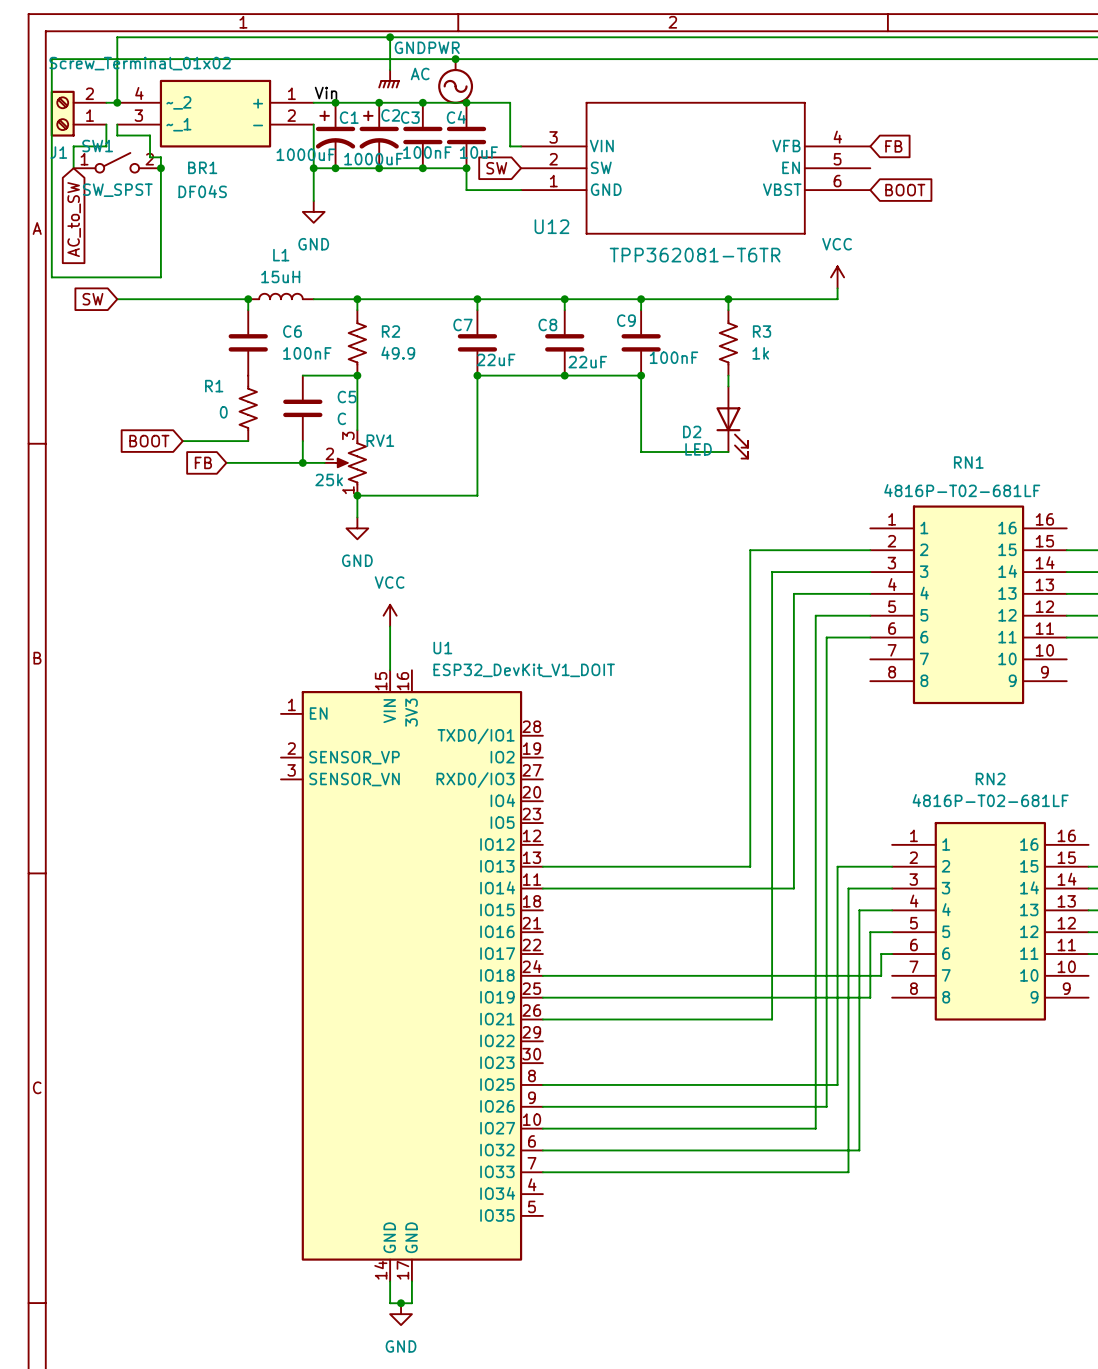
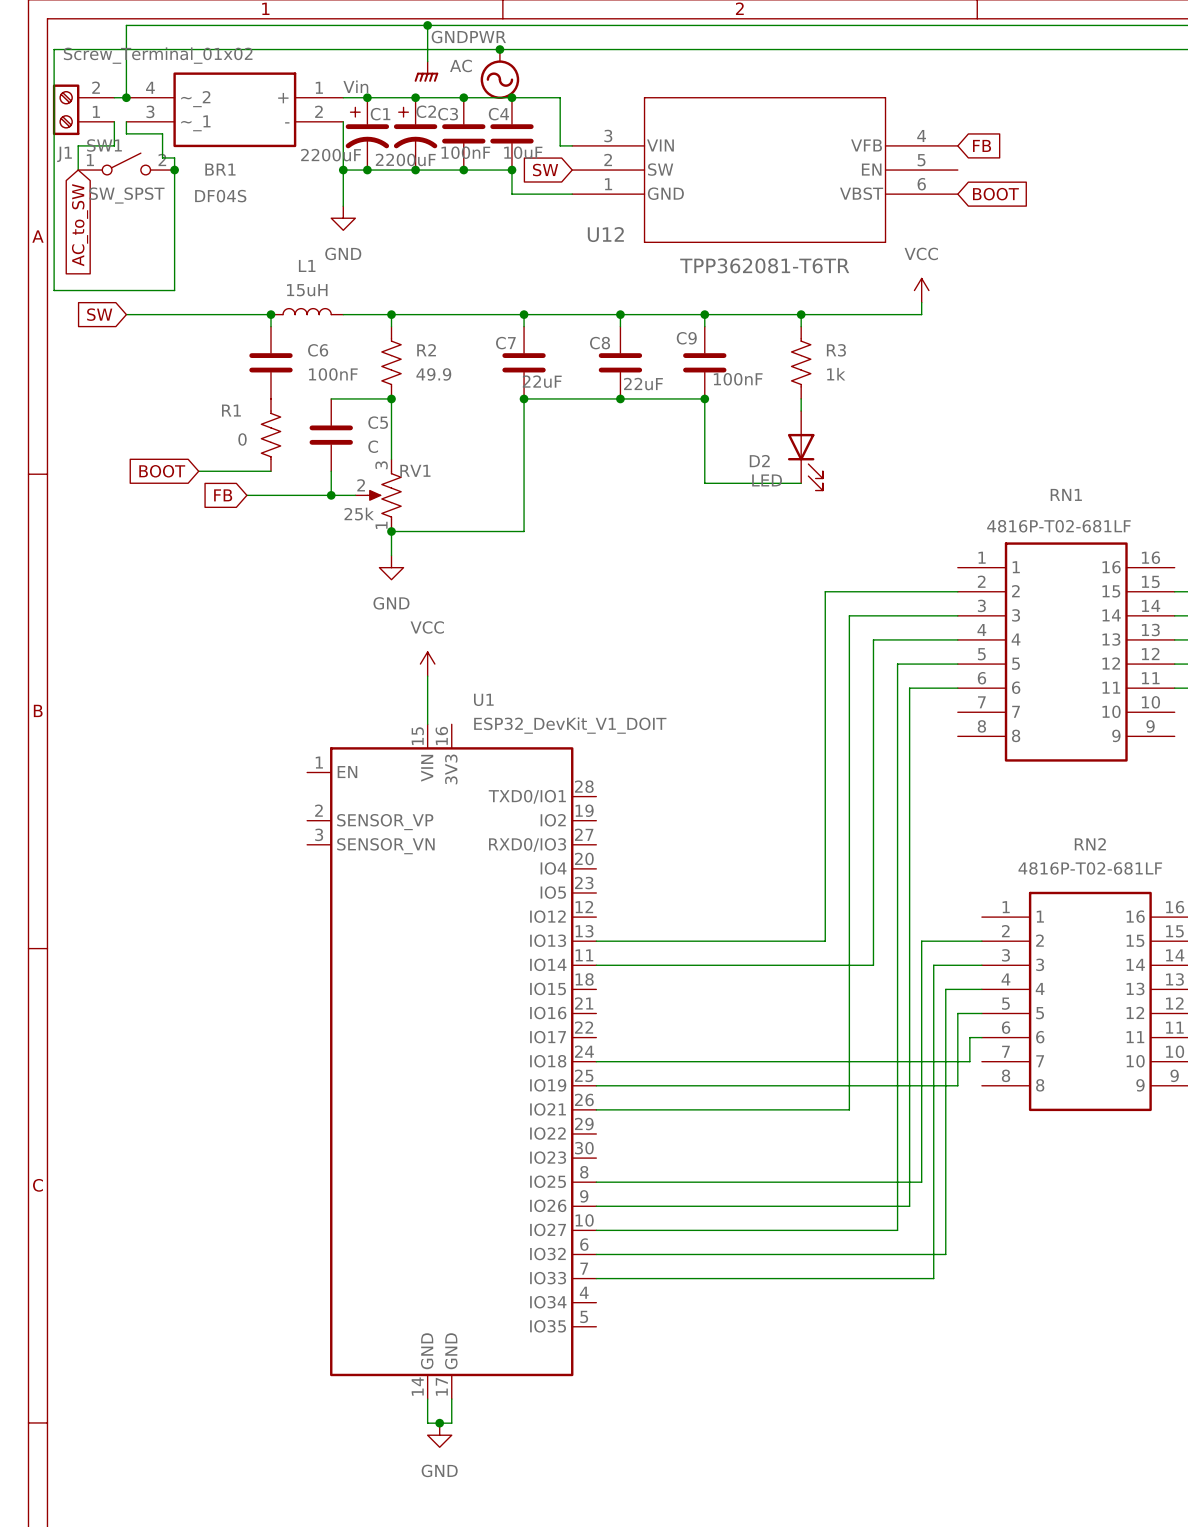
C1 value: 1000uF (305, 154) -> 2200uF (331, 155)
C2 value: 1000uF (373, 159) -> 2200uF (405, 159)

